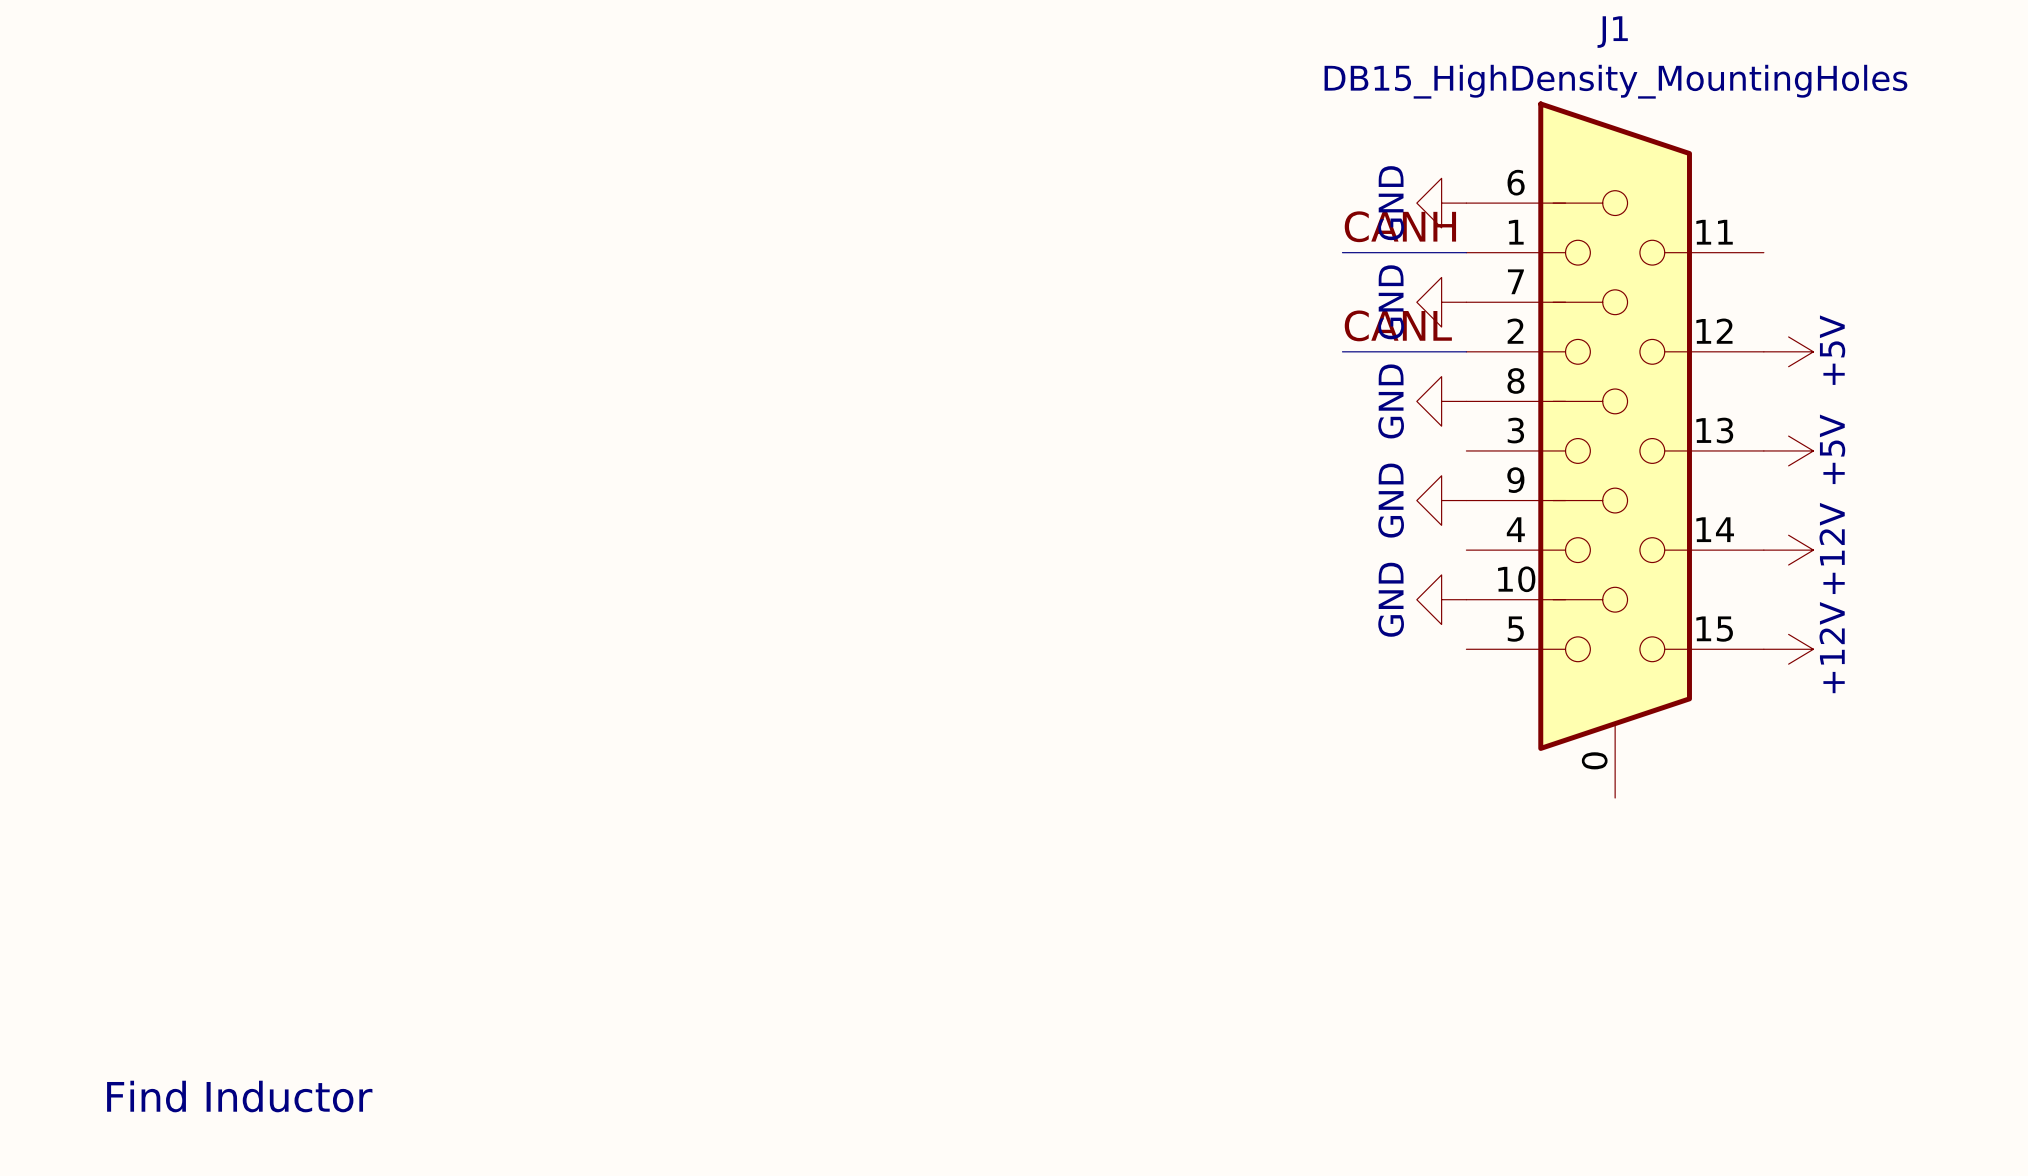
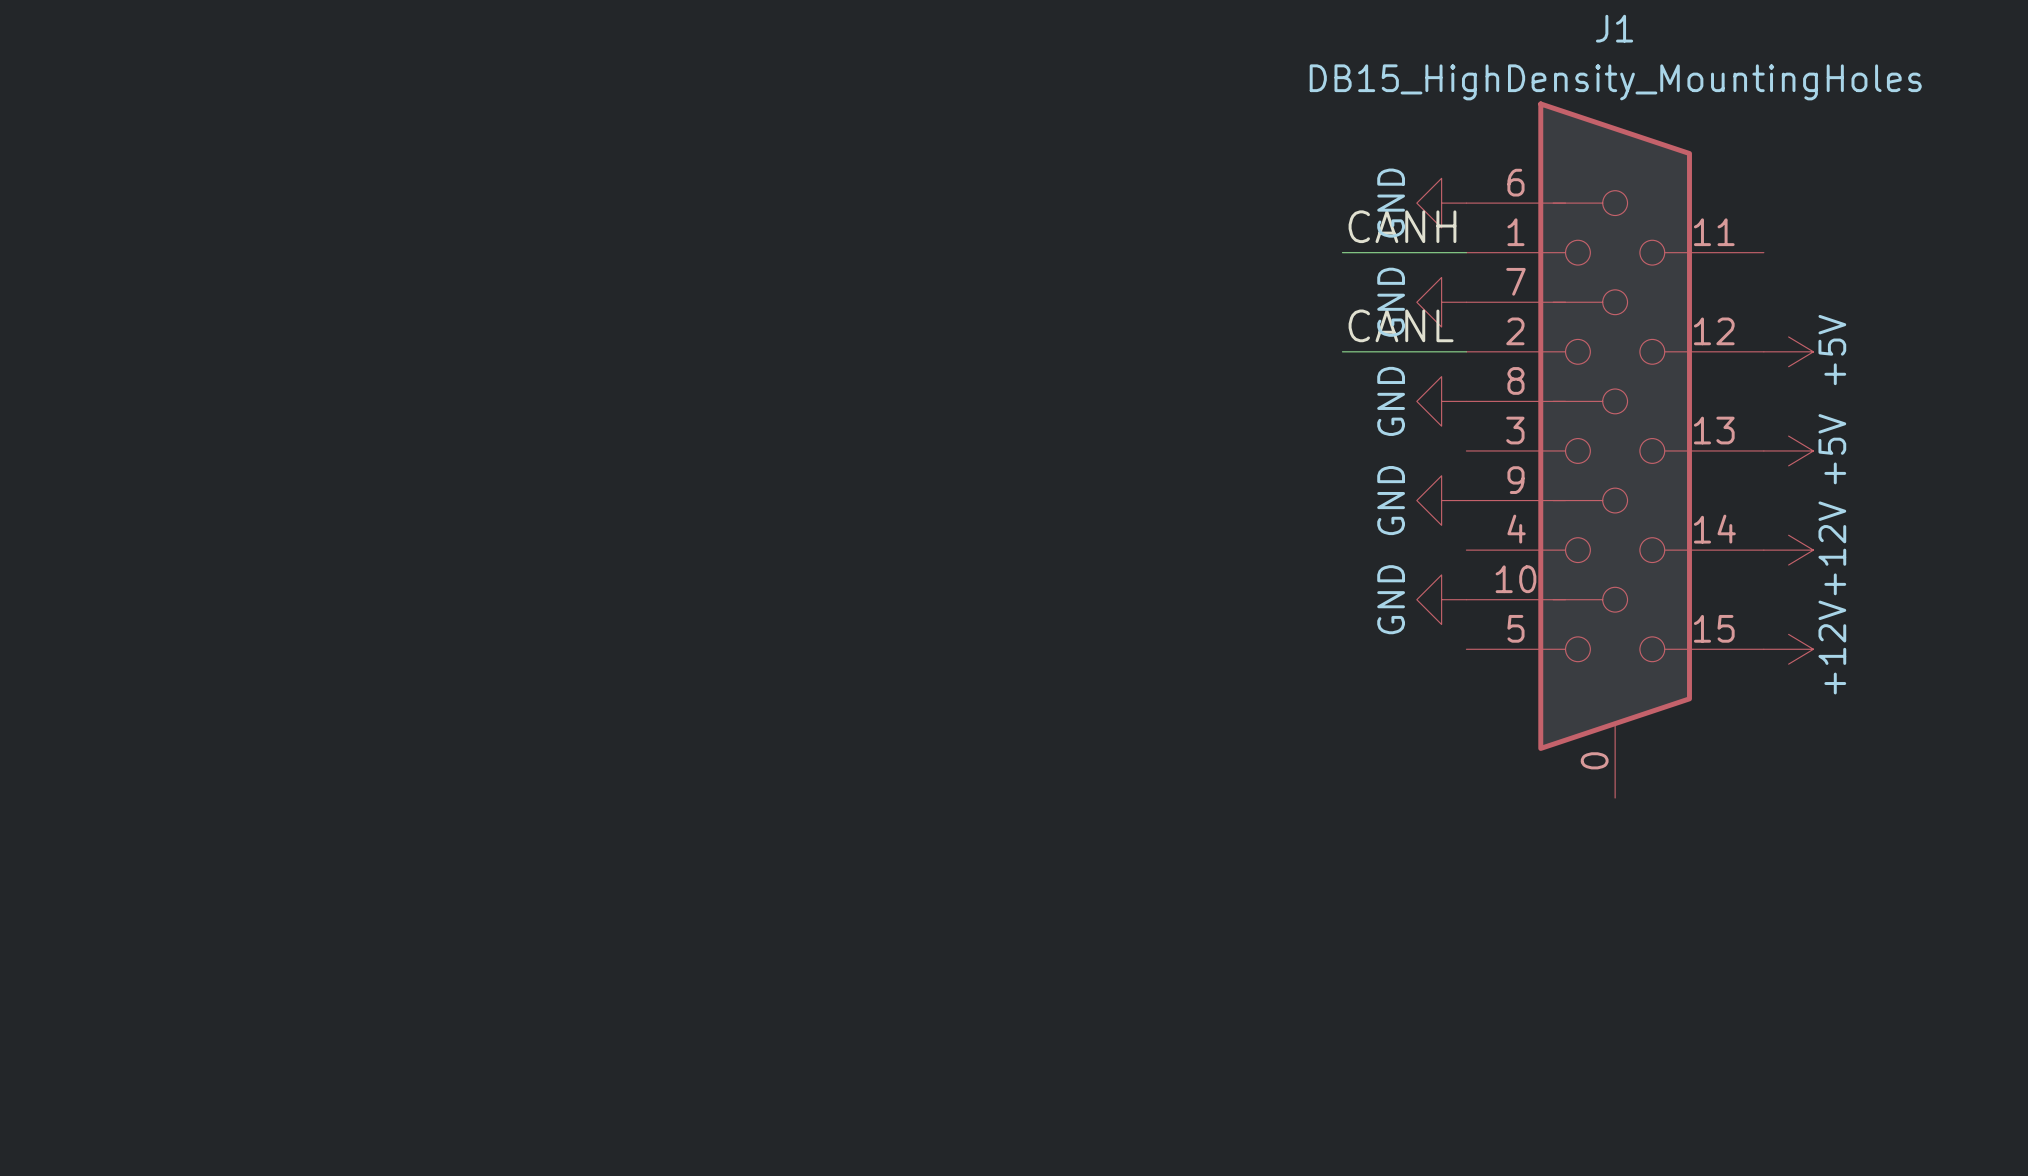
text: Find Inductor (239, 1096) -> none

